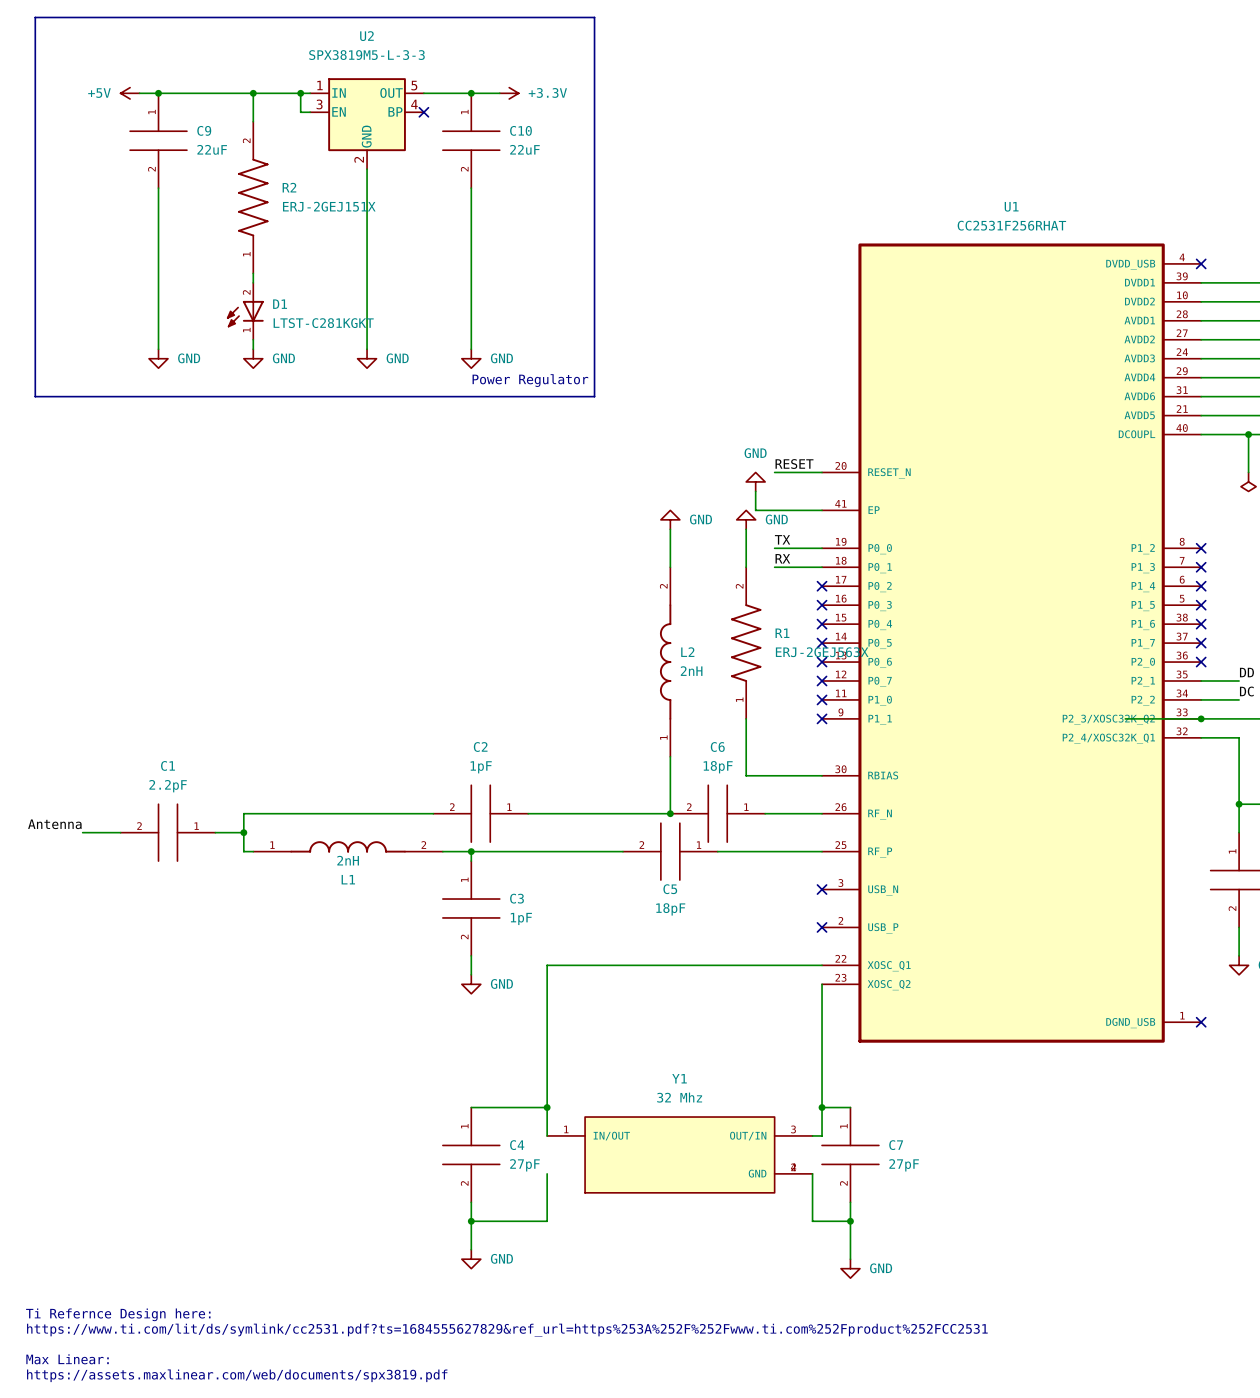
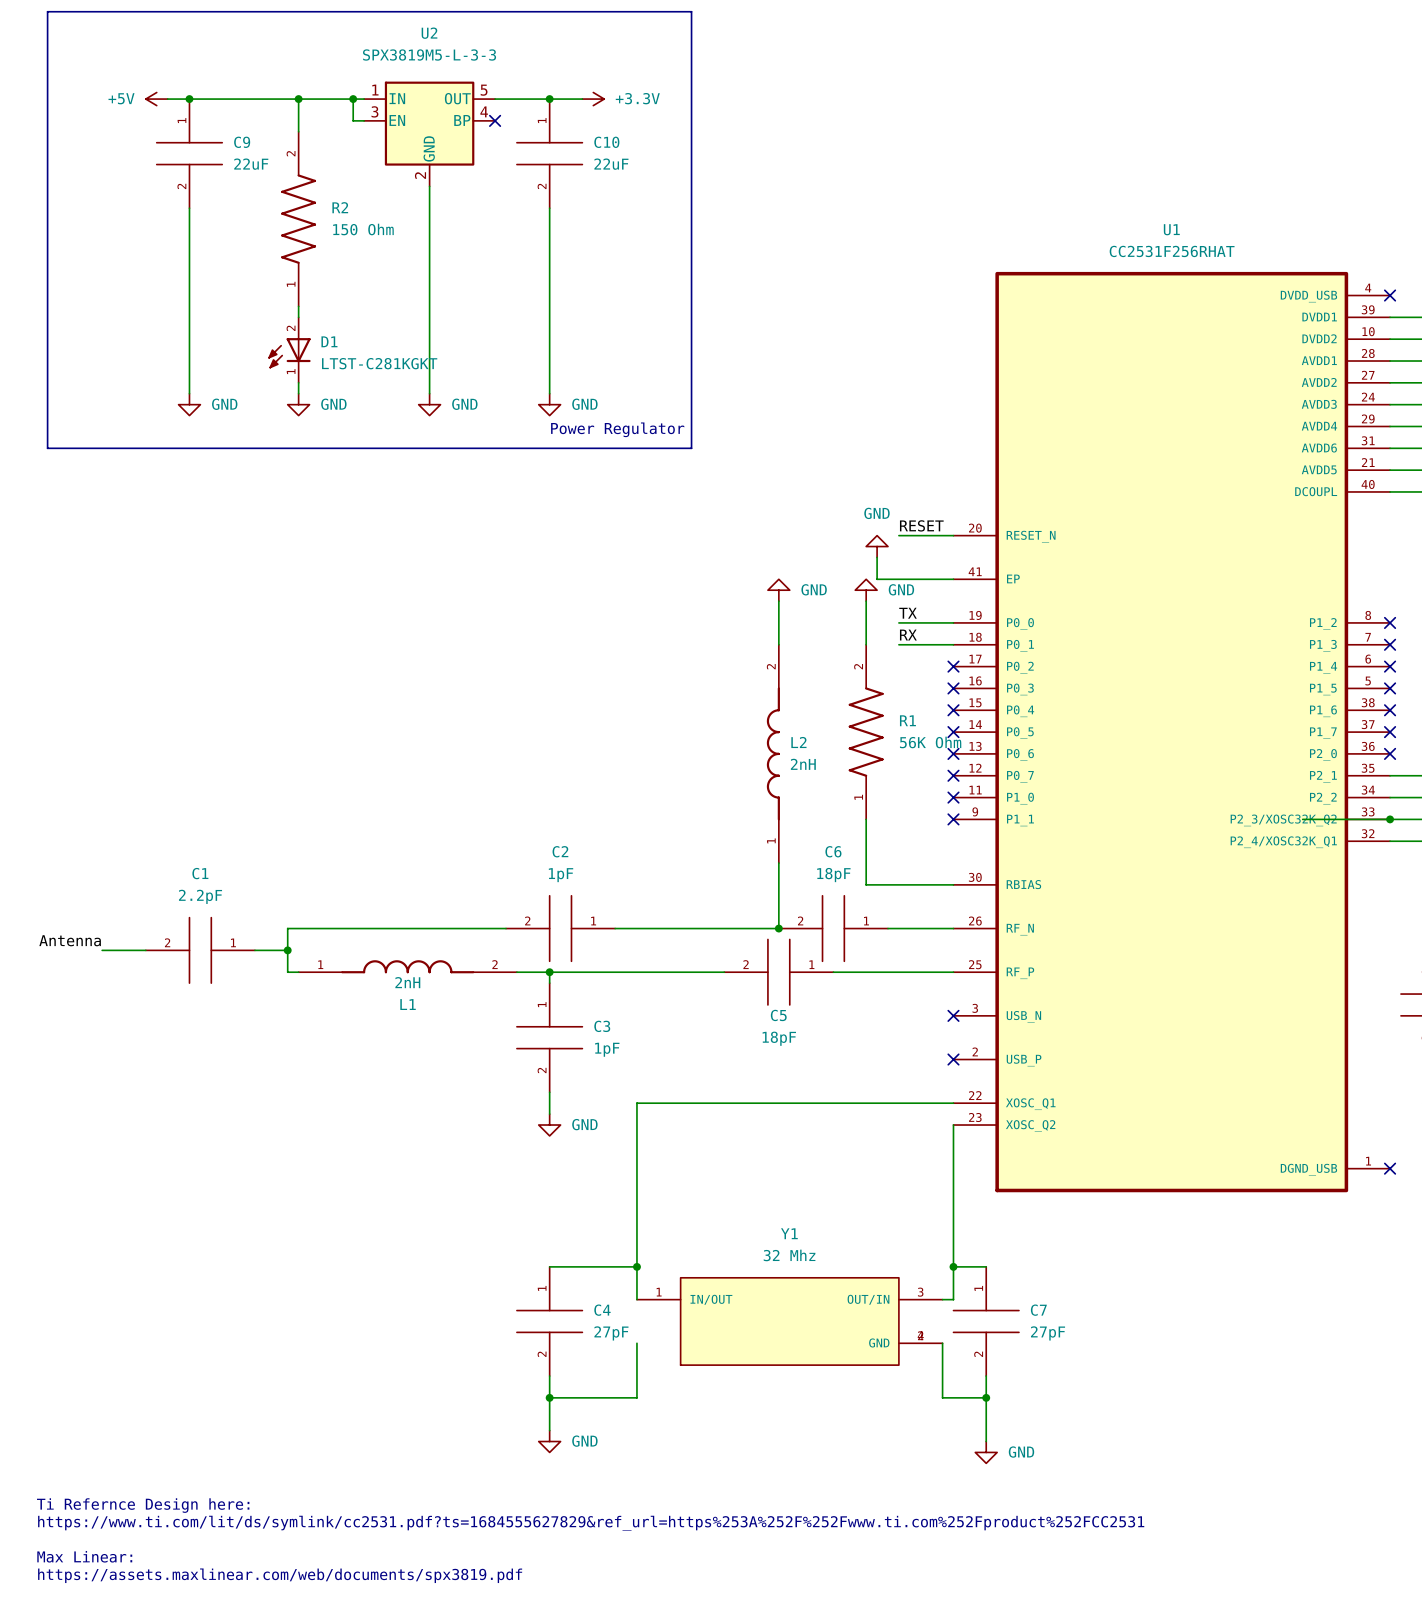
R2 value: ERJ-2GEJ151X (329, 206) -> 150 Ohm (363, 229)
R1 value: ERJ-2GEJ563X (822, 652) -> 56K Ohm (930, 742)

